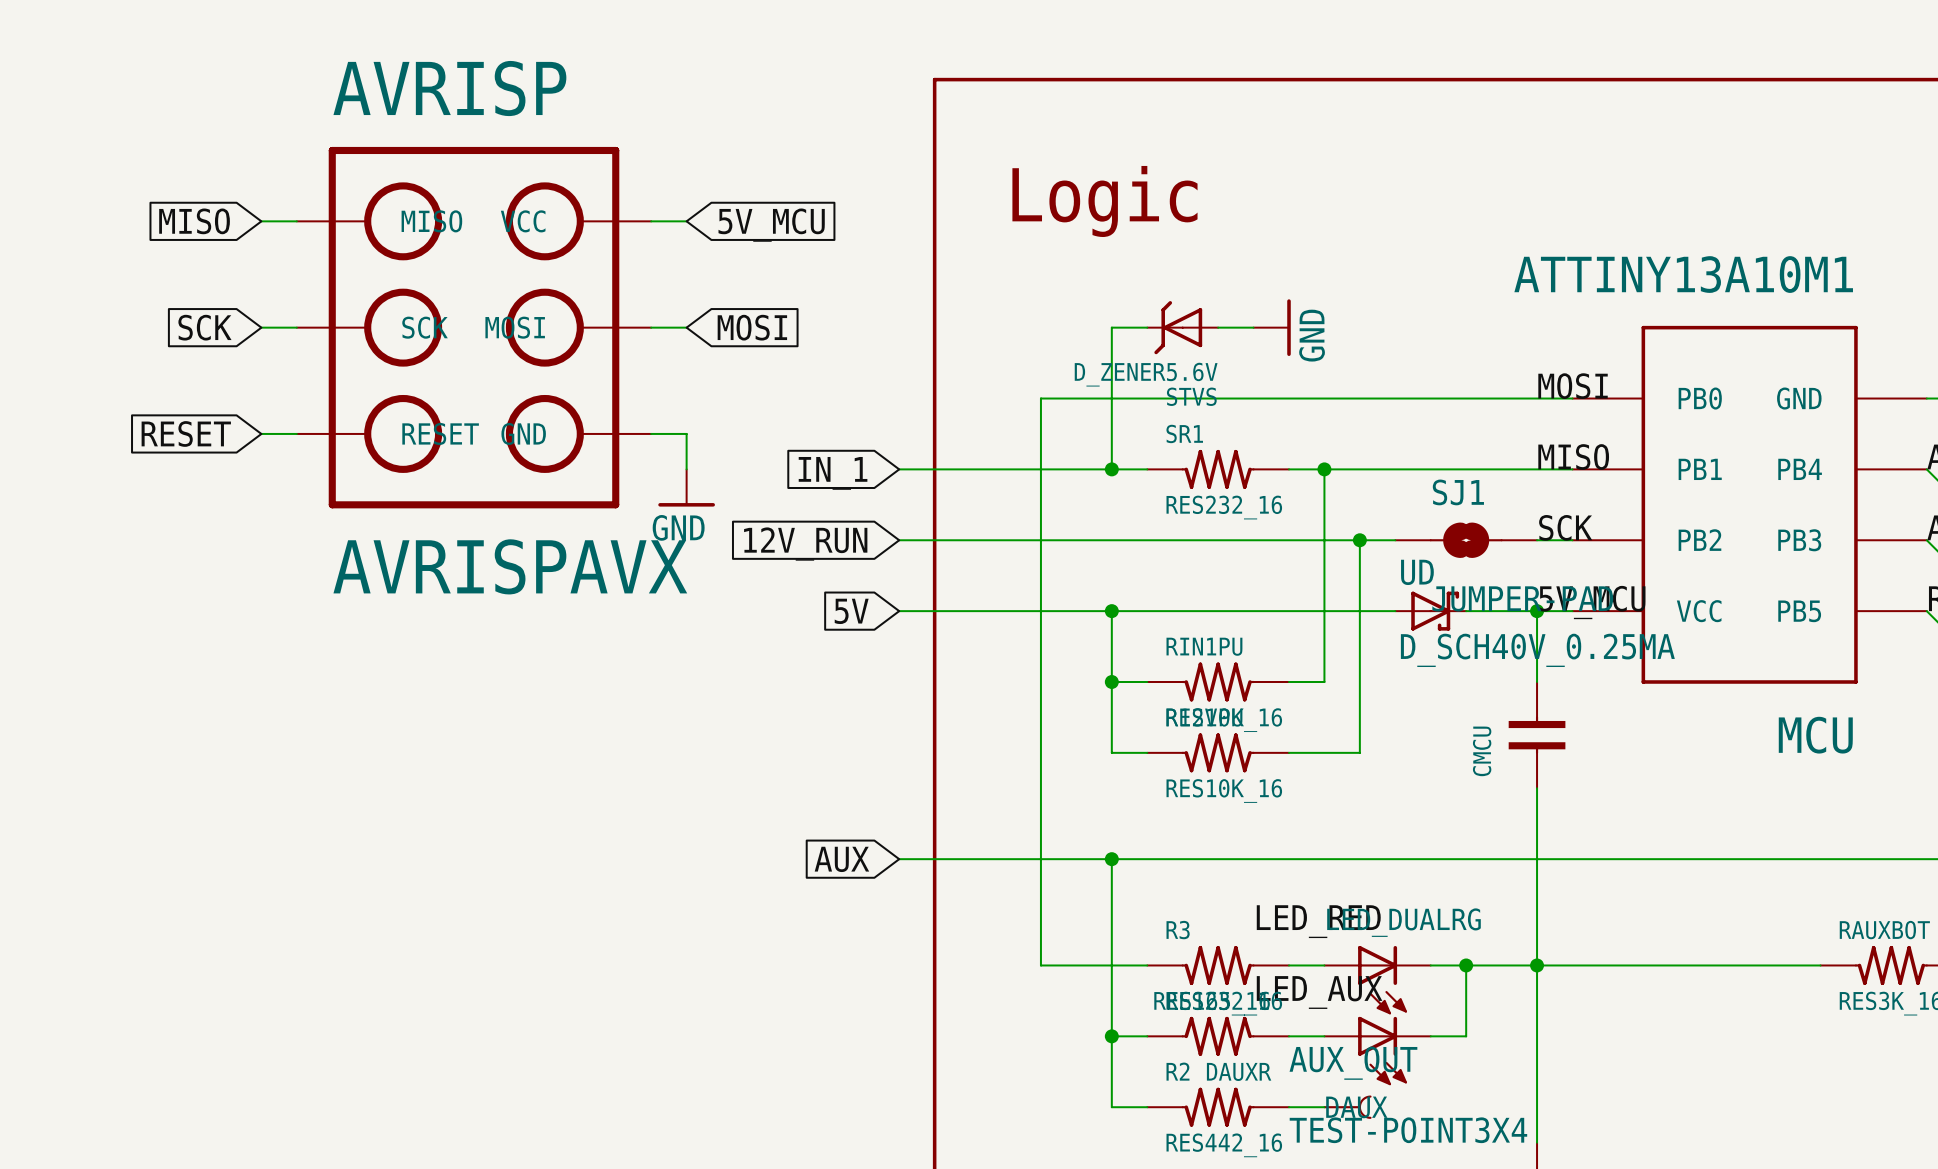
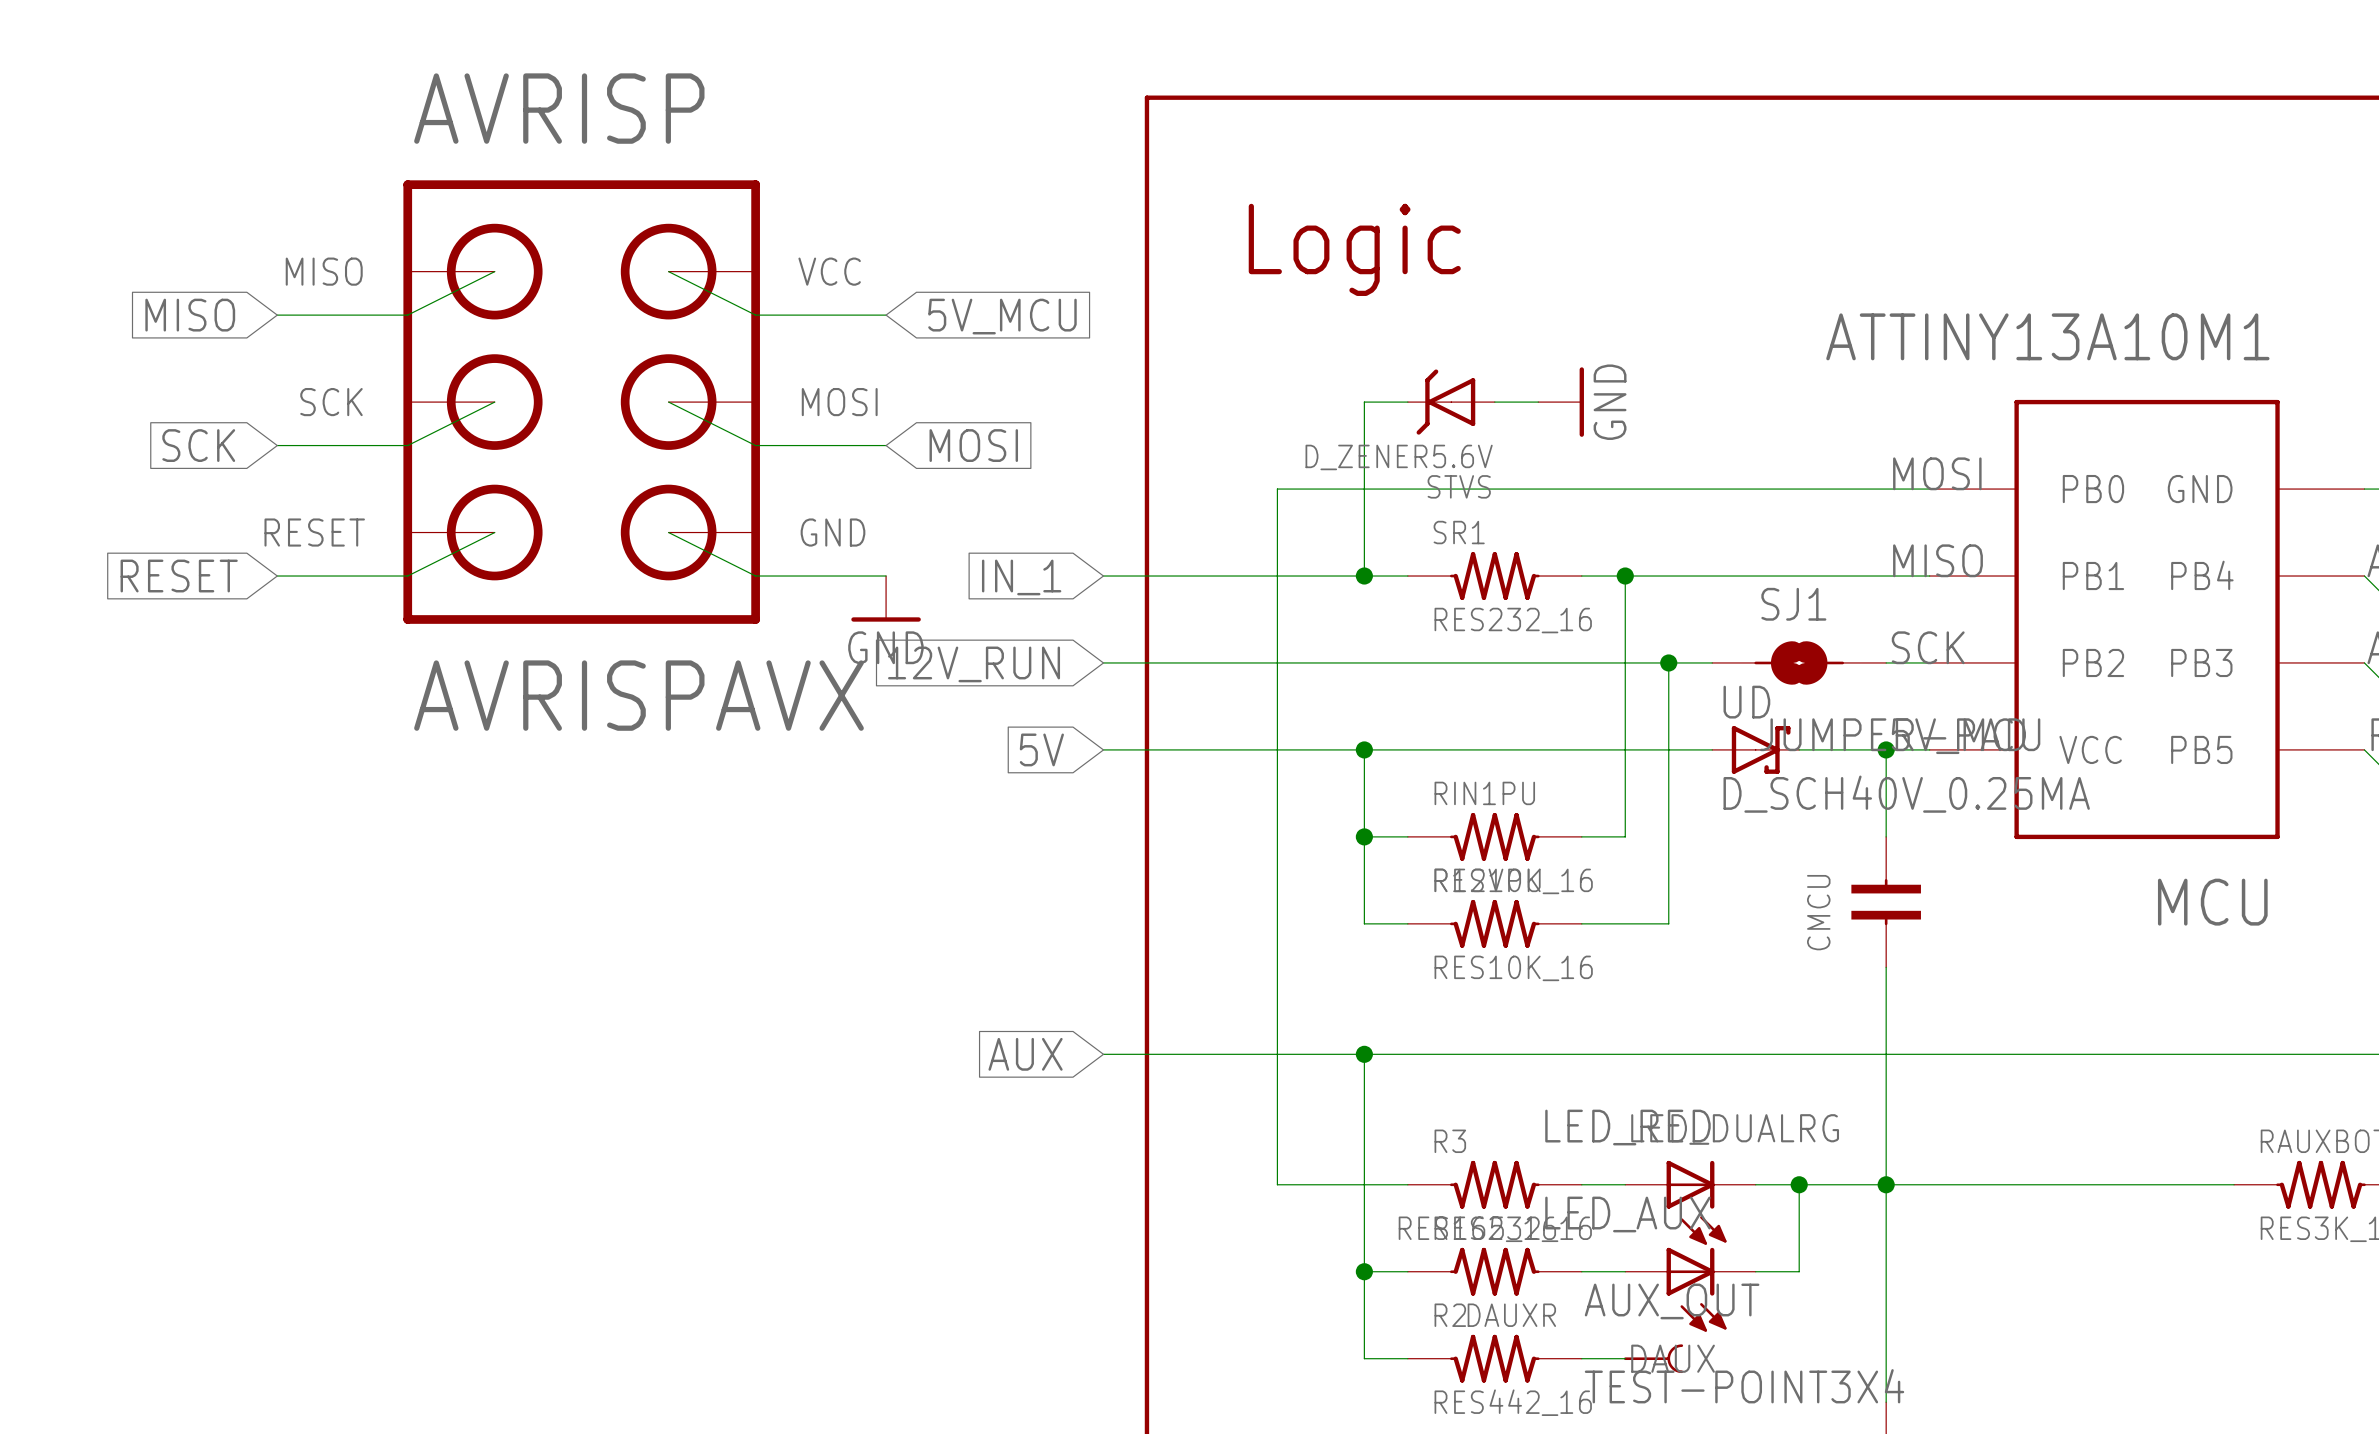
AVRISP symbol: [296, 146, 652, 509] -> [403, 180, 760, 624]
global label position: MISO (194, 221) -> MISO (190, 315)
wire: (261, 221) (296, 221) -> none
wire: none -> (494, 271) (407, 315) (277, 315)
wire: none -> (668, 271) (755, 315) (886, 315)
wire: (651, 221) (686, 221) -> none
global label position: 5V_MCU (771, 225) -> 5V_MCU (1002, 316)
global label position: SCK (204, 327) -> SCK (198, 445)
wire: (261, 327) (296, 327) -> none
wire: none -> (494, 402) (407, 445) (277, 445)
wire: none -> (668, 402) (755, 445) (886, 445)
wire: (651, 327) (686, 327) -> none
global label position: MOSI (752, 327) -> MOSI (973, 445)
global label position: RESET (186, 433) -> RESET (179, 576)
wire: (261, 433) (296, 433) -> none
wire: none -> (494, 532) (407, 576) (277, 576)
wire: none -> (668, 532) (755, 576) (886, 576)
wire: (651, 433) (686, 433) (686, 469) -> none
power symbol position: GND (686, 487) -> GND (886, 598)

